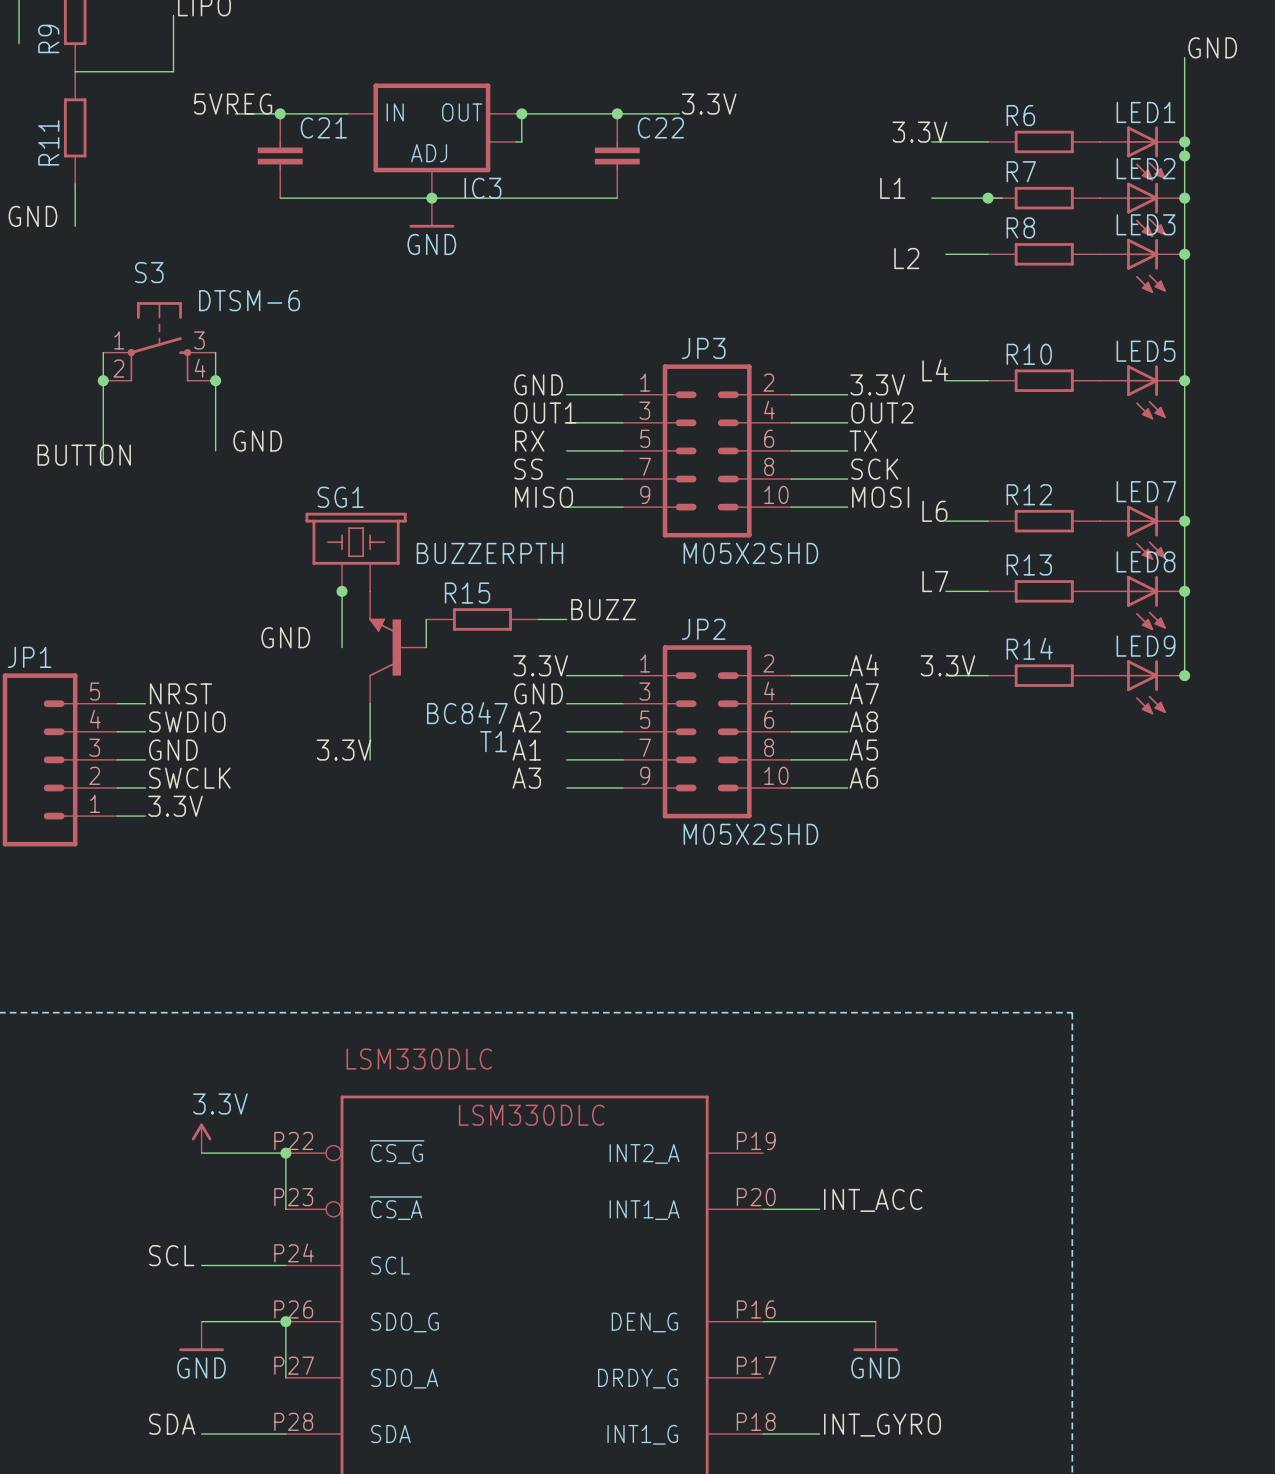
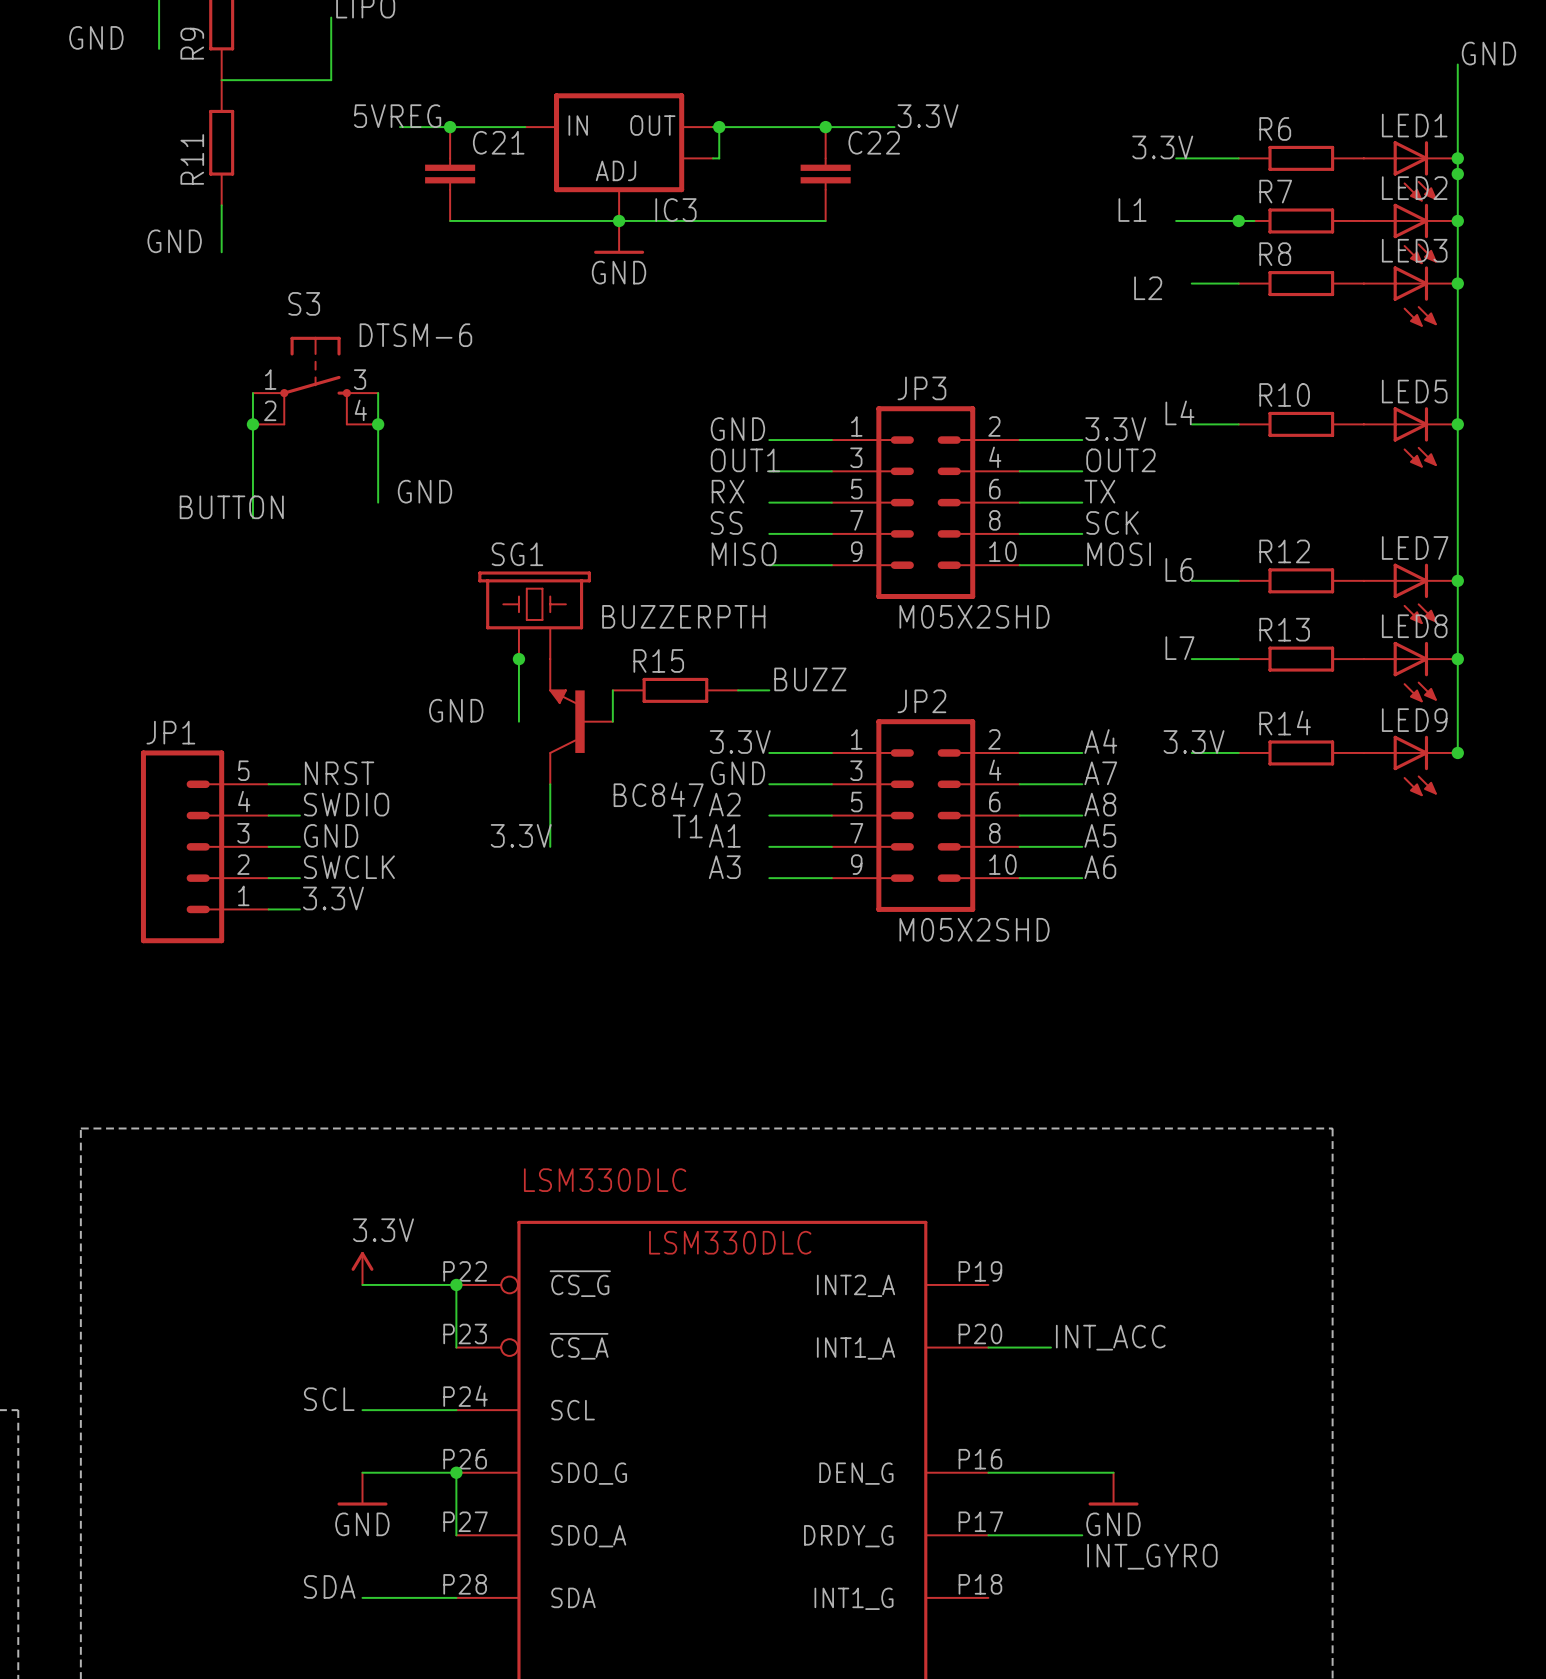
wire: none -> (988, 1535) (1082, 1535)
label position: INT_GYRO (882, 1425) -> INT_GYRO (1152, 1556)
wire: (763, 1434) (819, 1434) -> none

